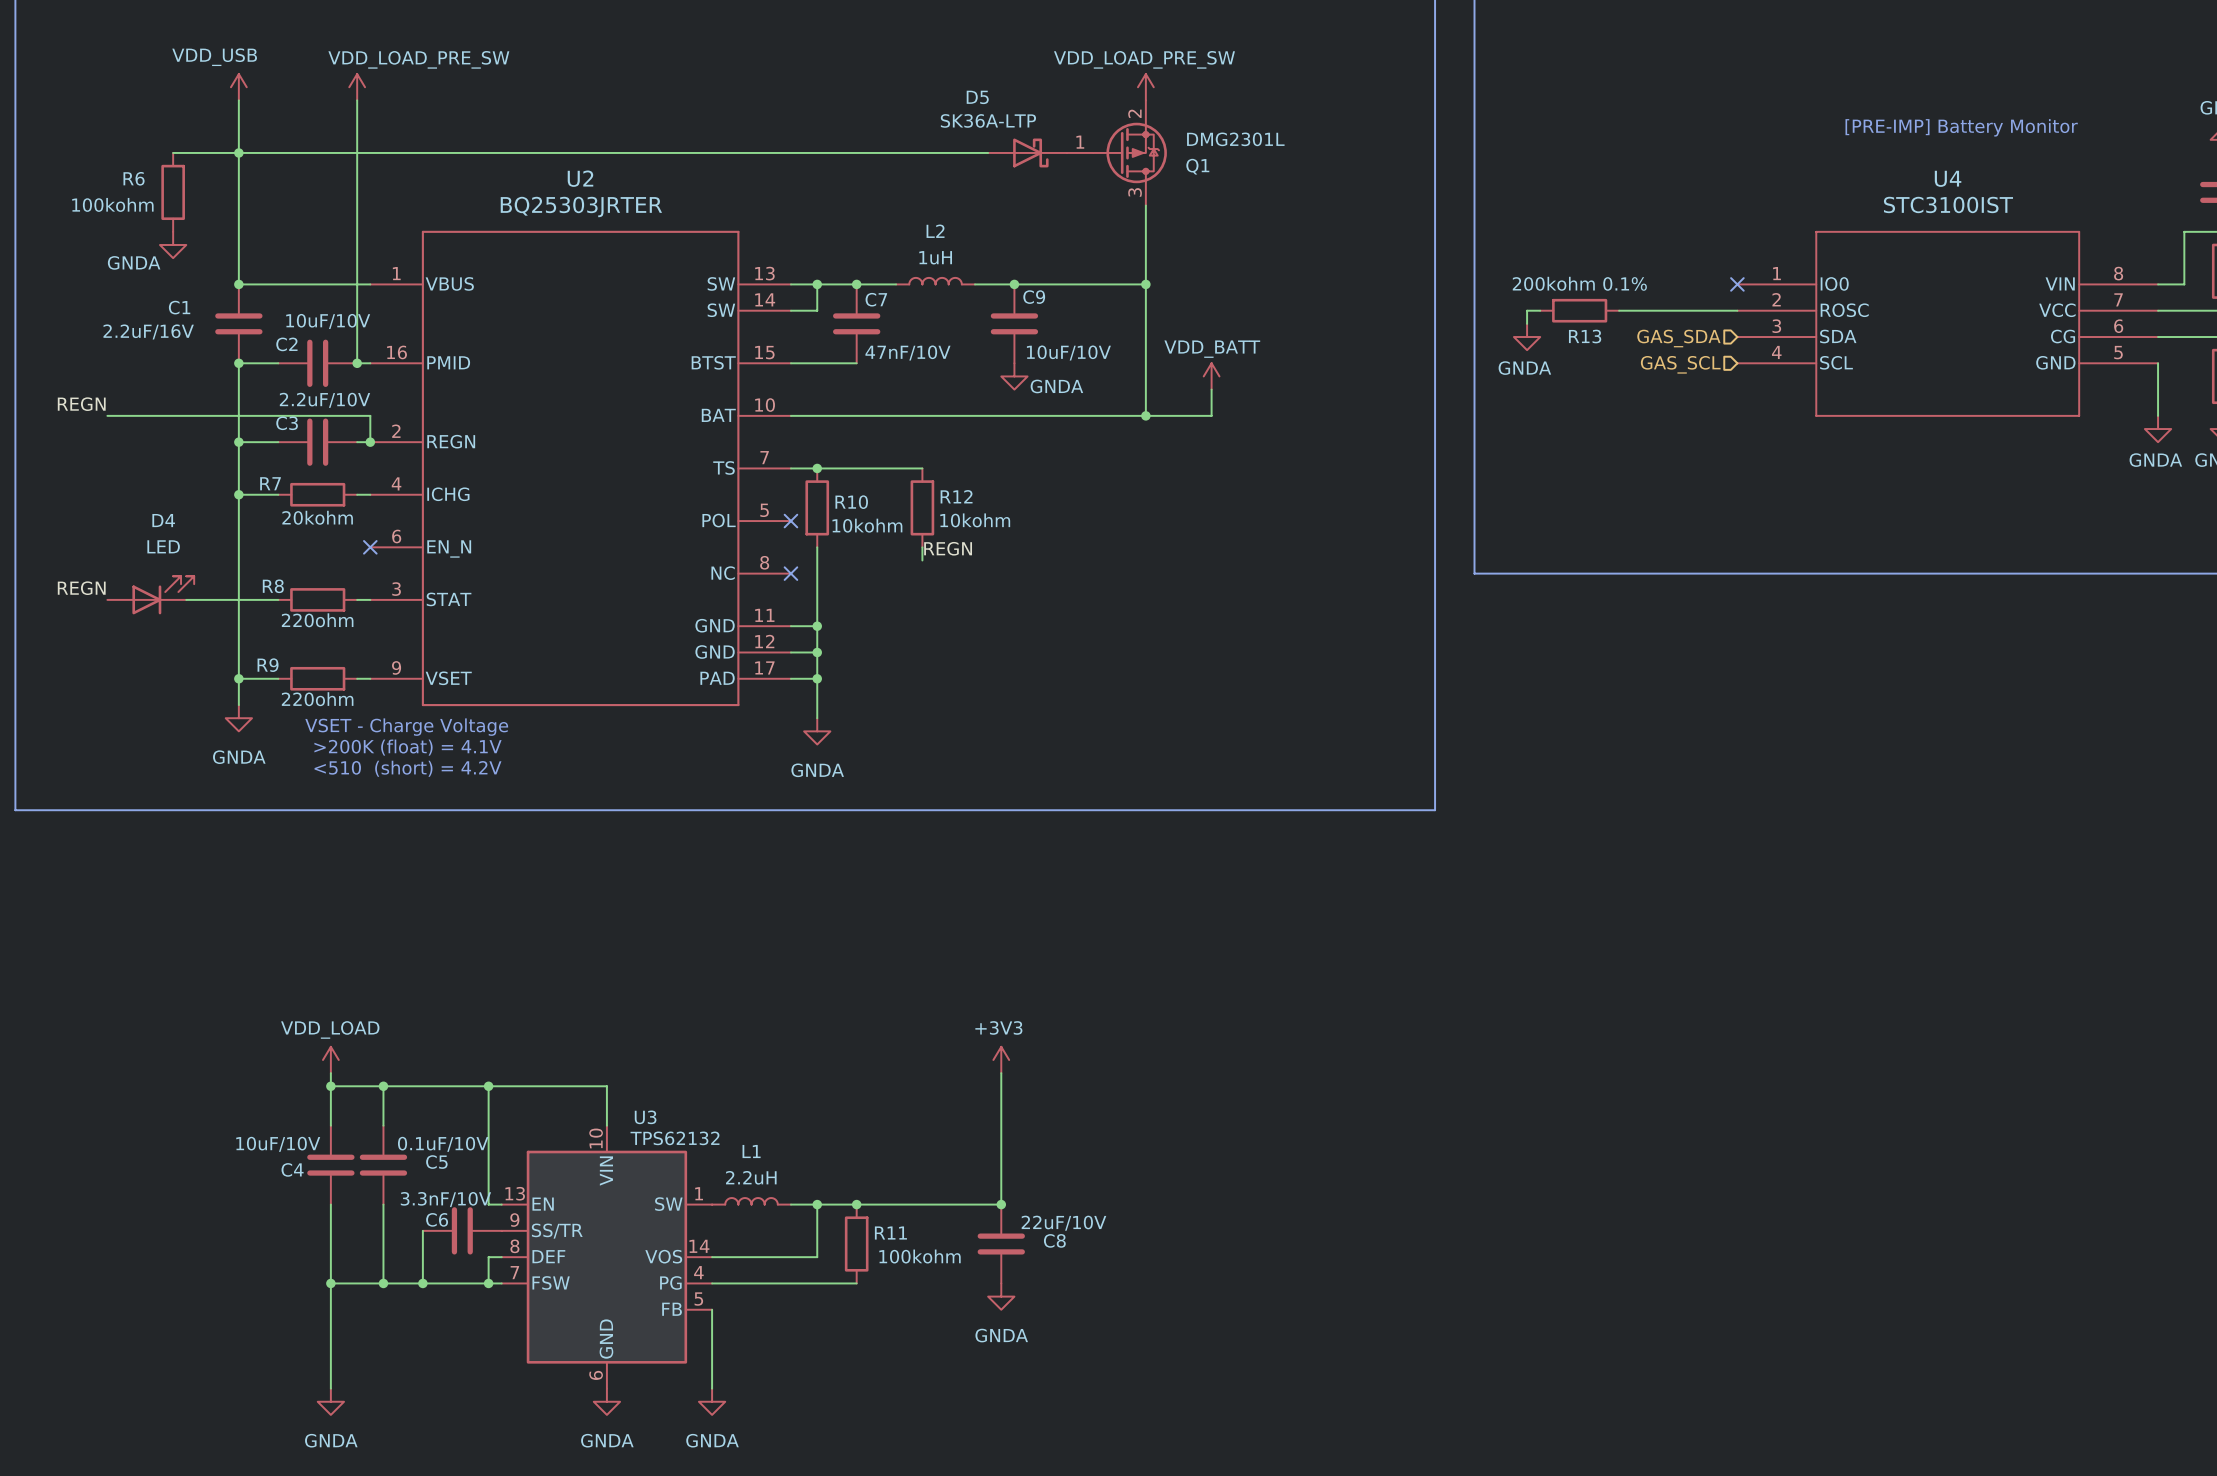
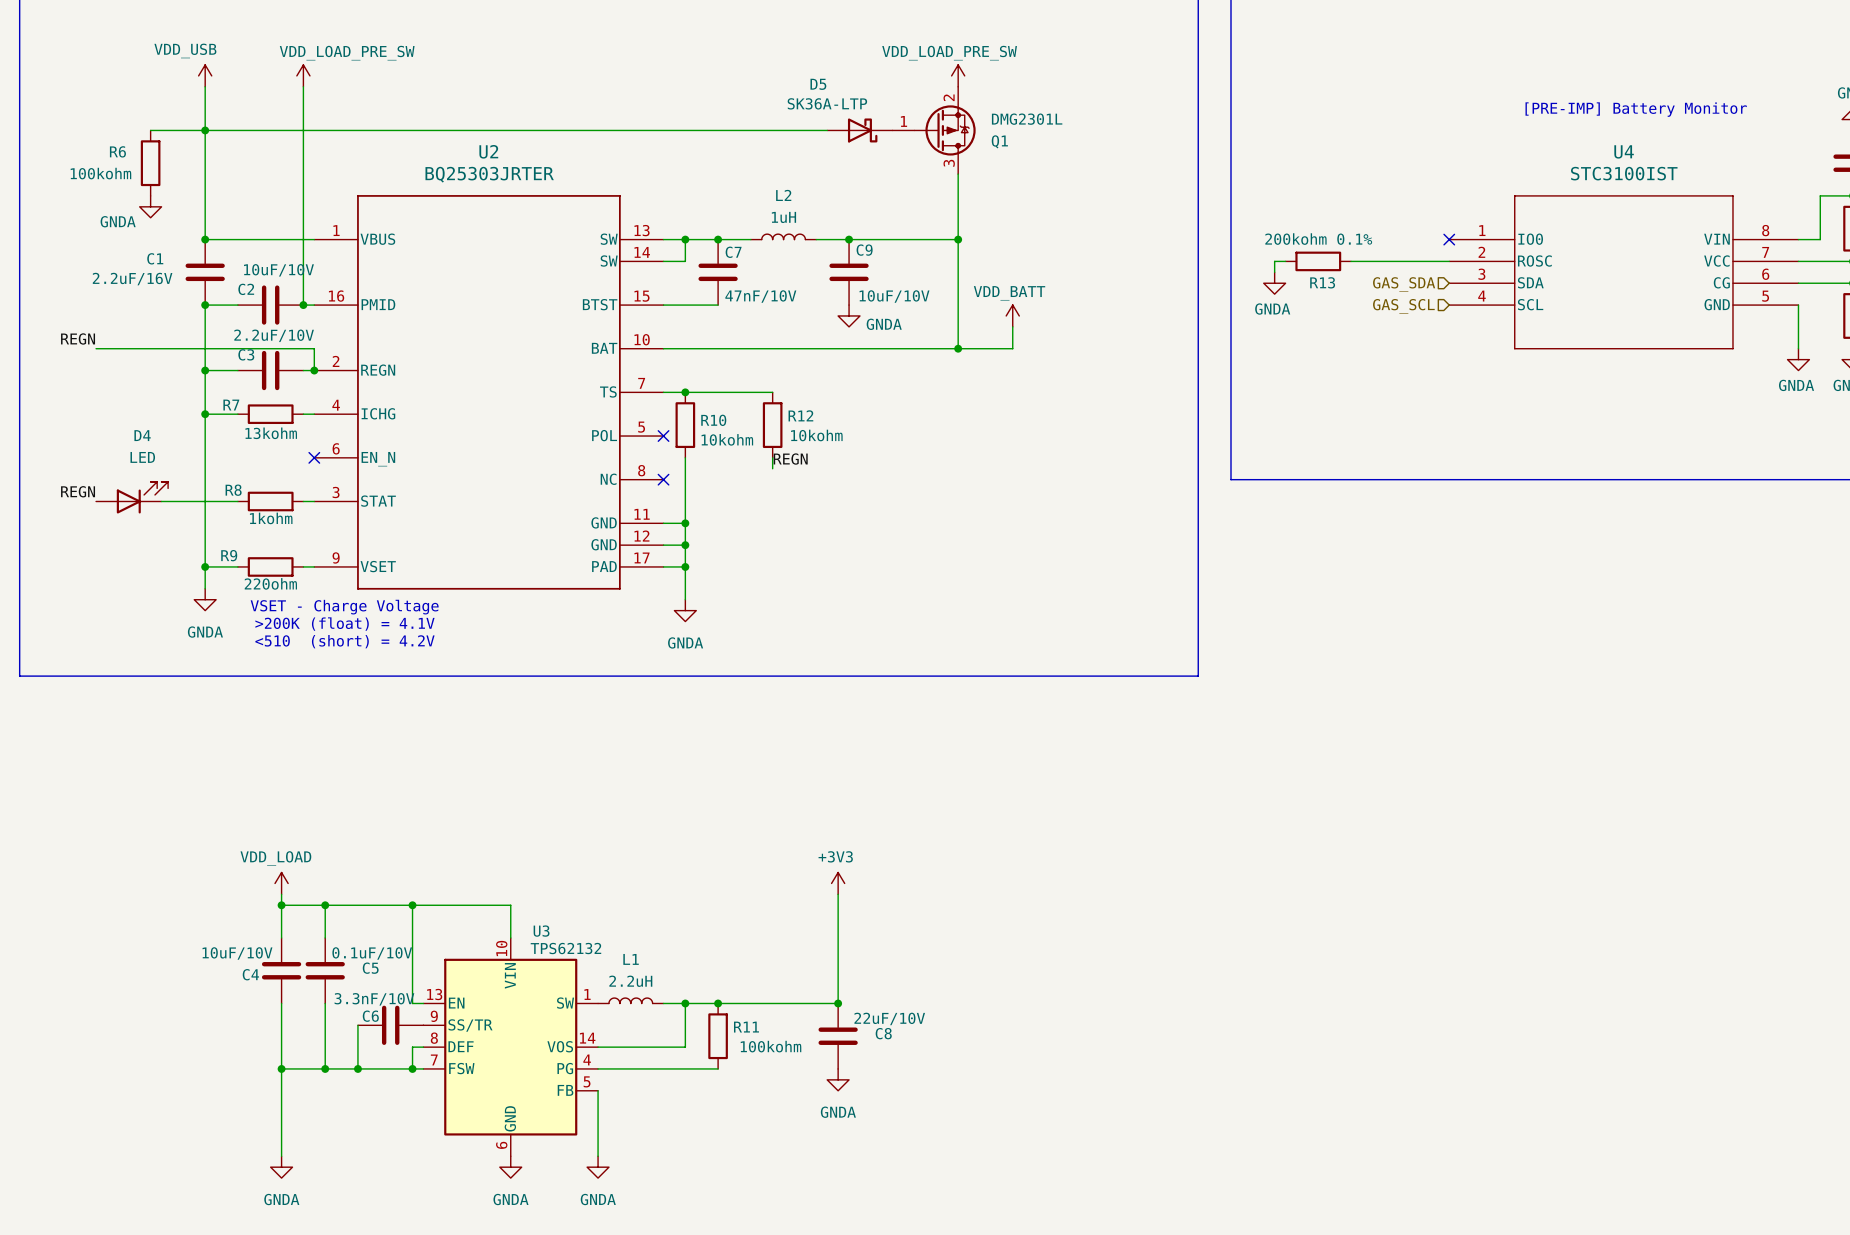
R7 value: 20kohm (317, 517) -> 13kohm (271, 433)
R8 value: 220ohm (317, 620) -> 1kohm (271, 518)

